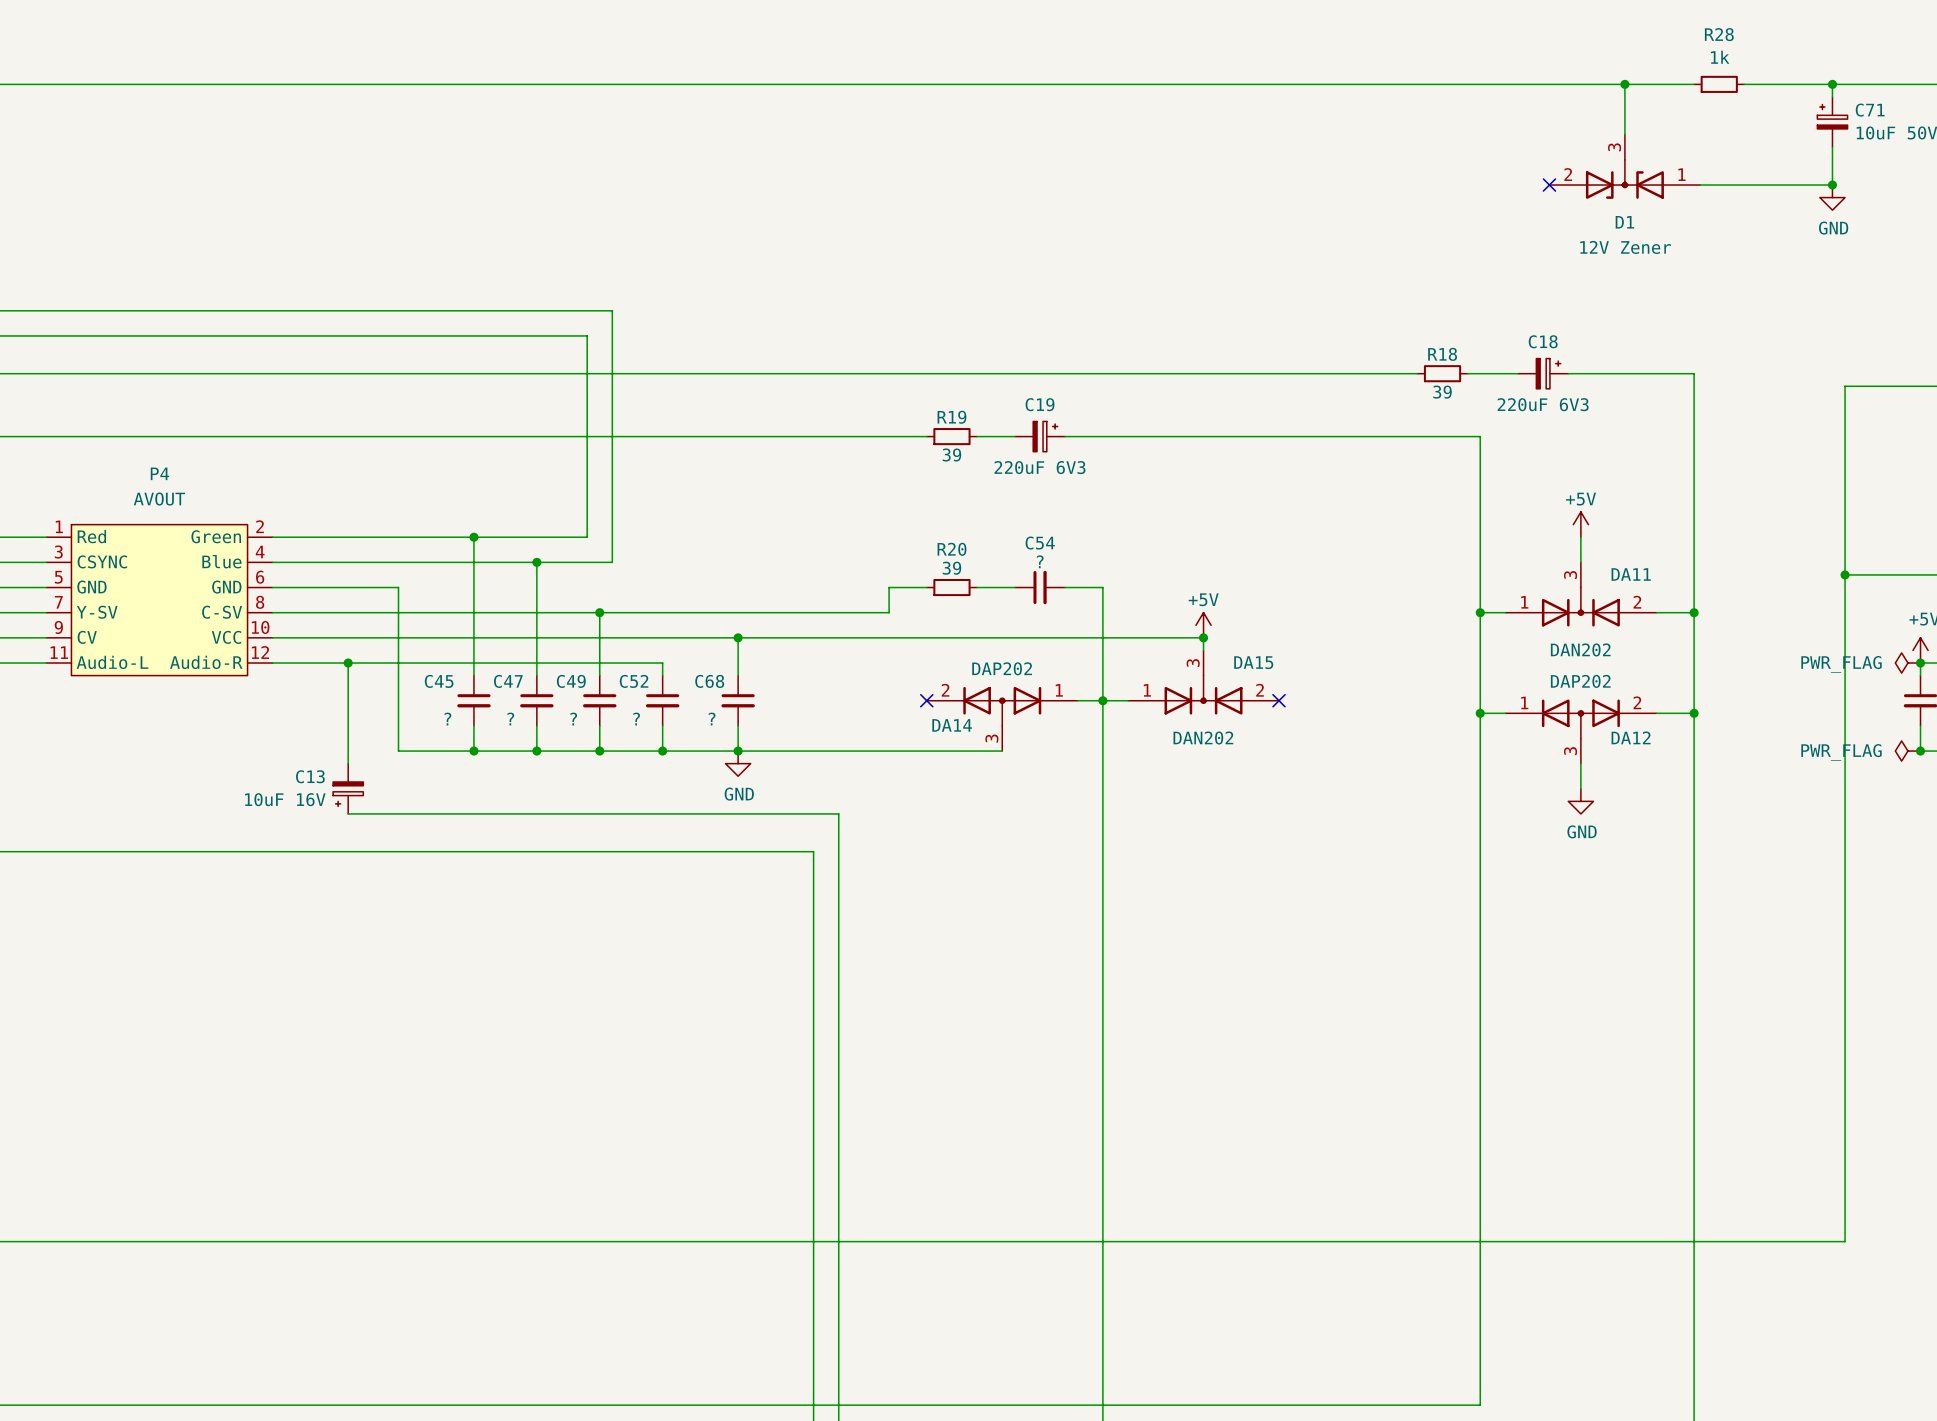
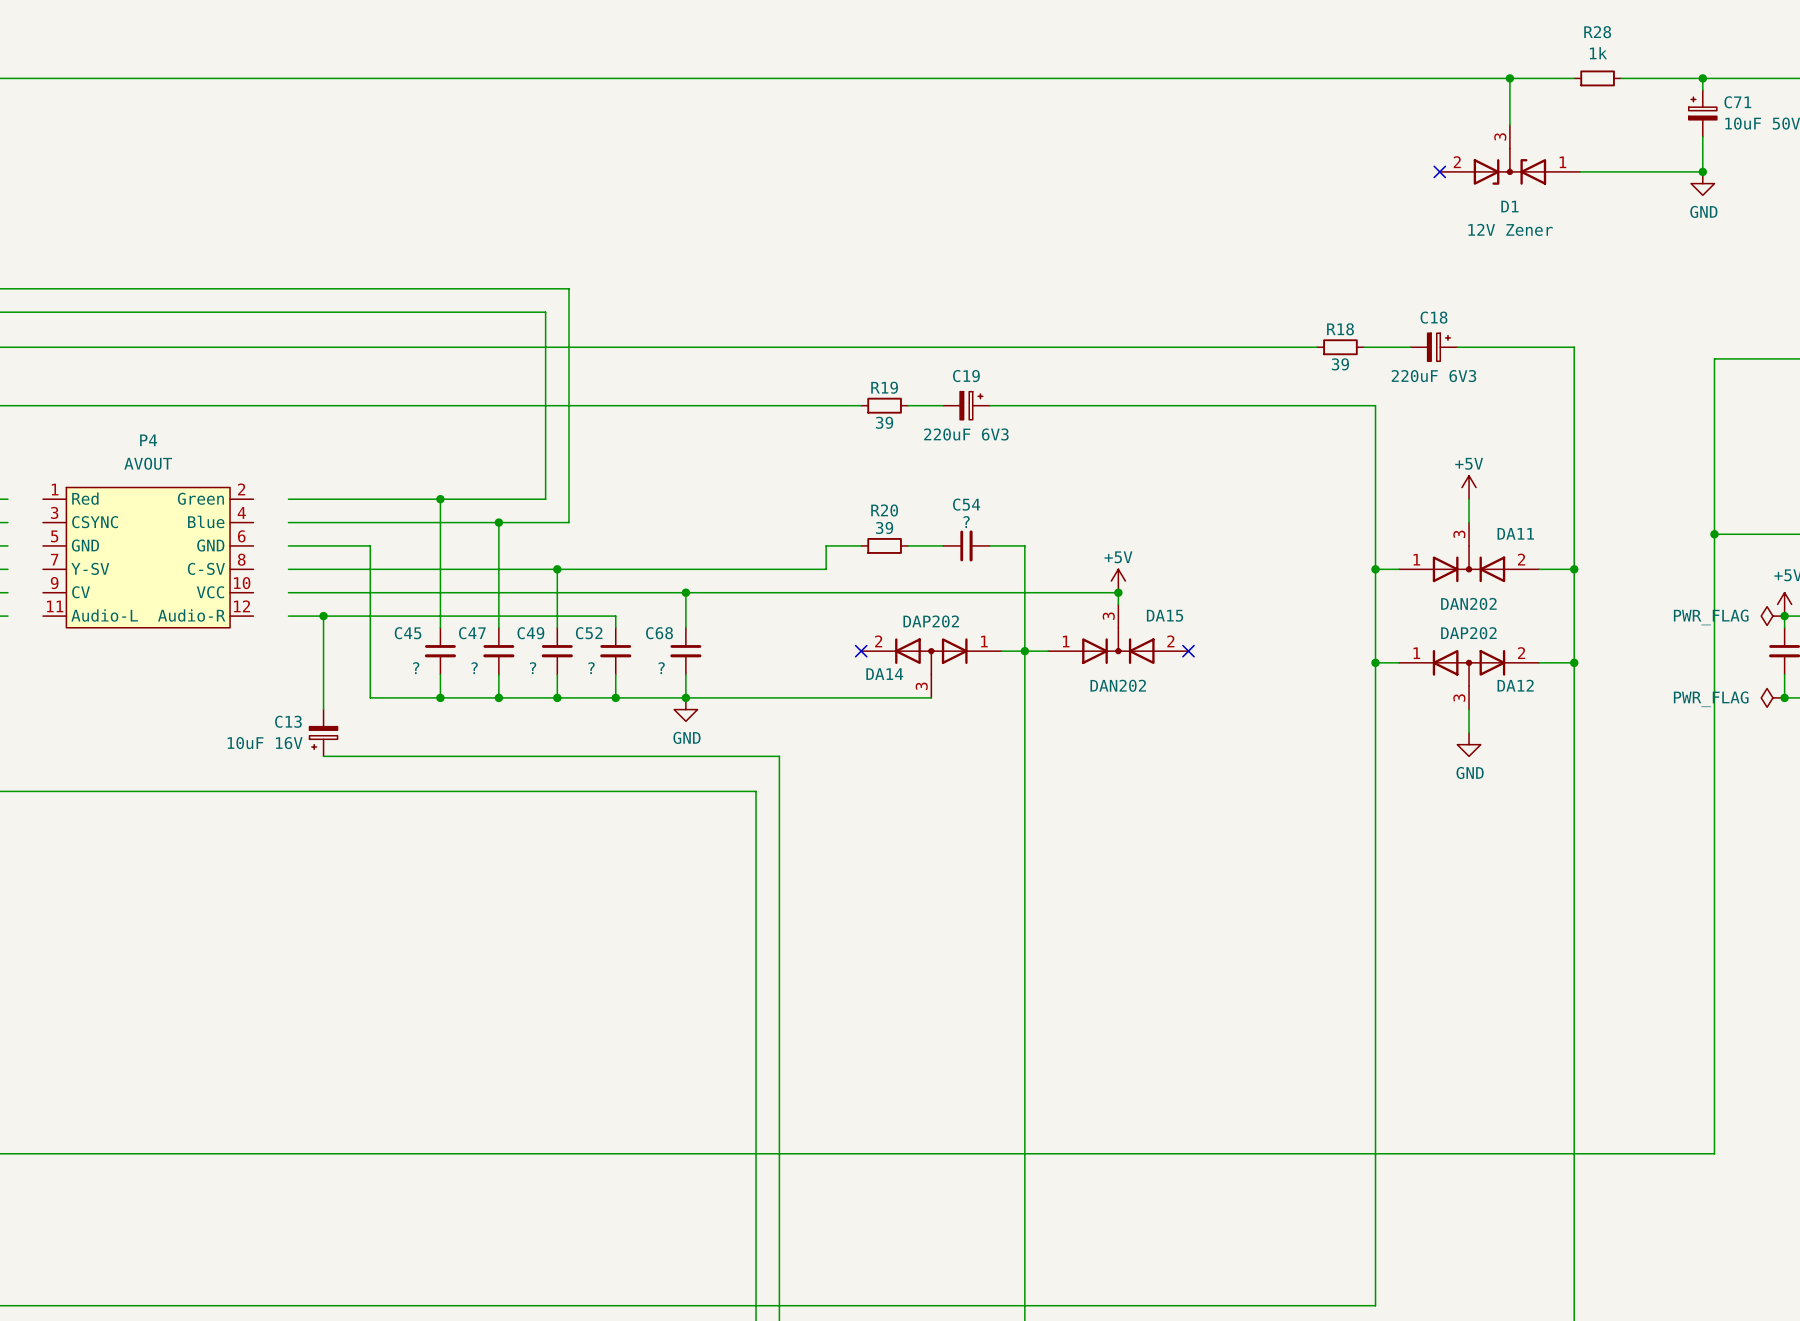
wire: (8, 537) (46, 537) -> none
wire: (272, 537) (310, 537) -> none
wire: (8, 562) (46, 562) -> none
wire: (272, 562) (310, 562) -> none
wire: (8, 587) (46, 587) -> none
wire: (272, 587) (310, 587) -> none
wire: (8, 612) (46, 612) -> none
wire: (272, 612) (310, 612) -> none
wire: (8, 637) (46, 637) -> none
wire: (272, 637) (310, 637) -> none
wire: (8, 663) (46, 663) -> none
wire: (272, 663) (310, 663) -> none

